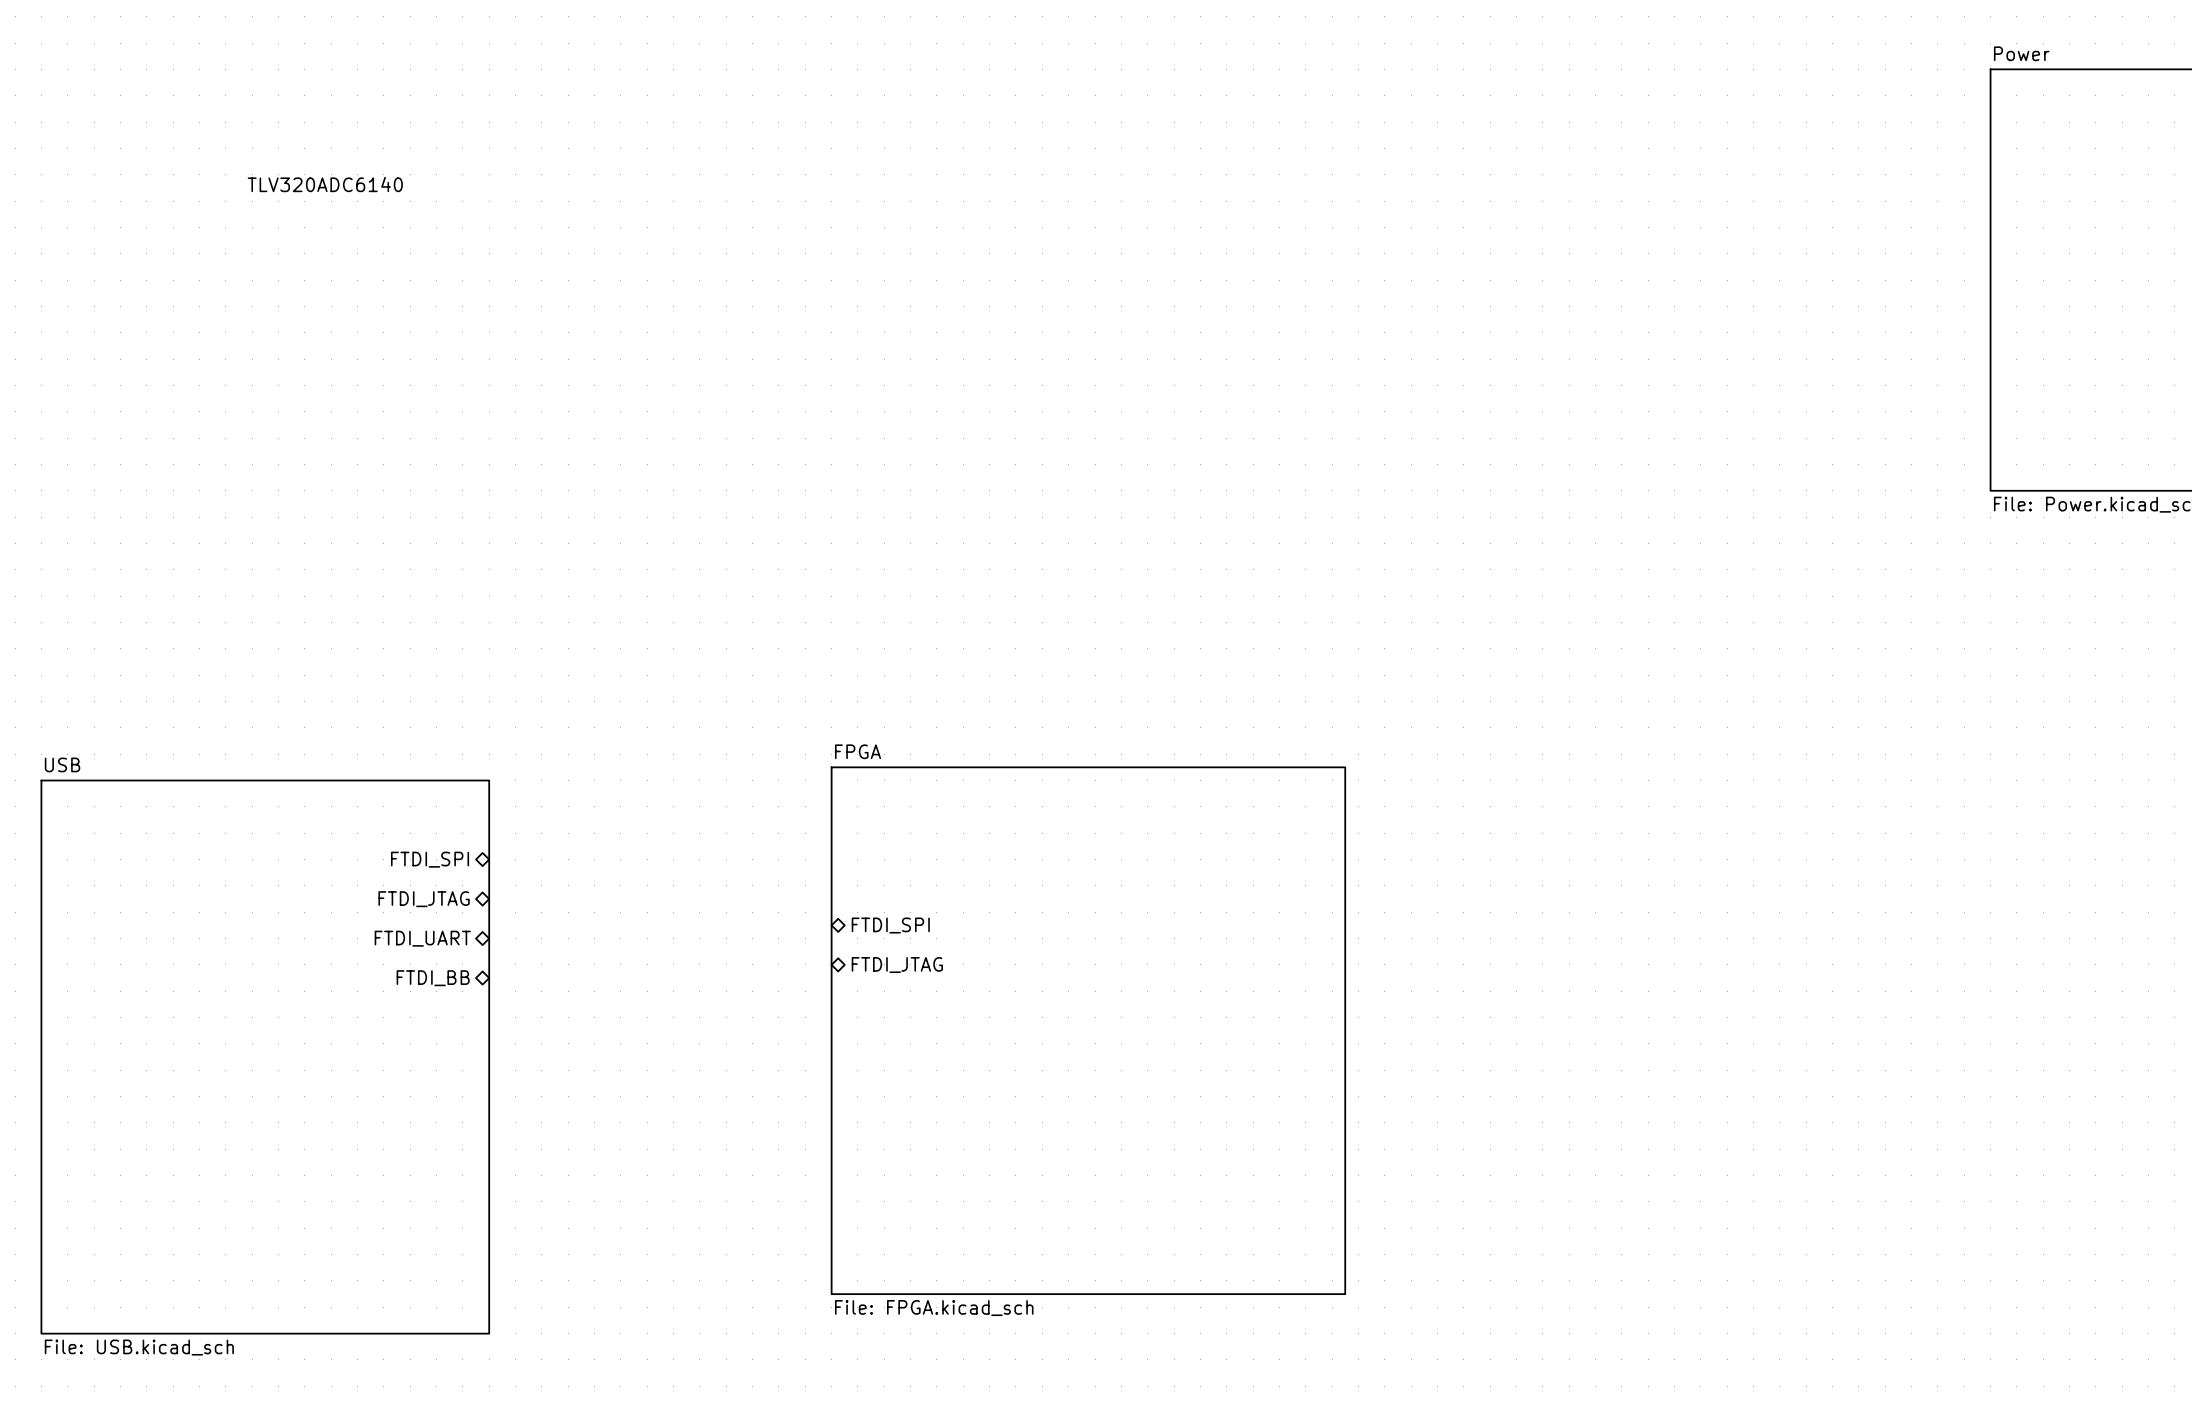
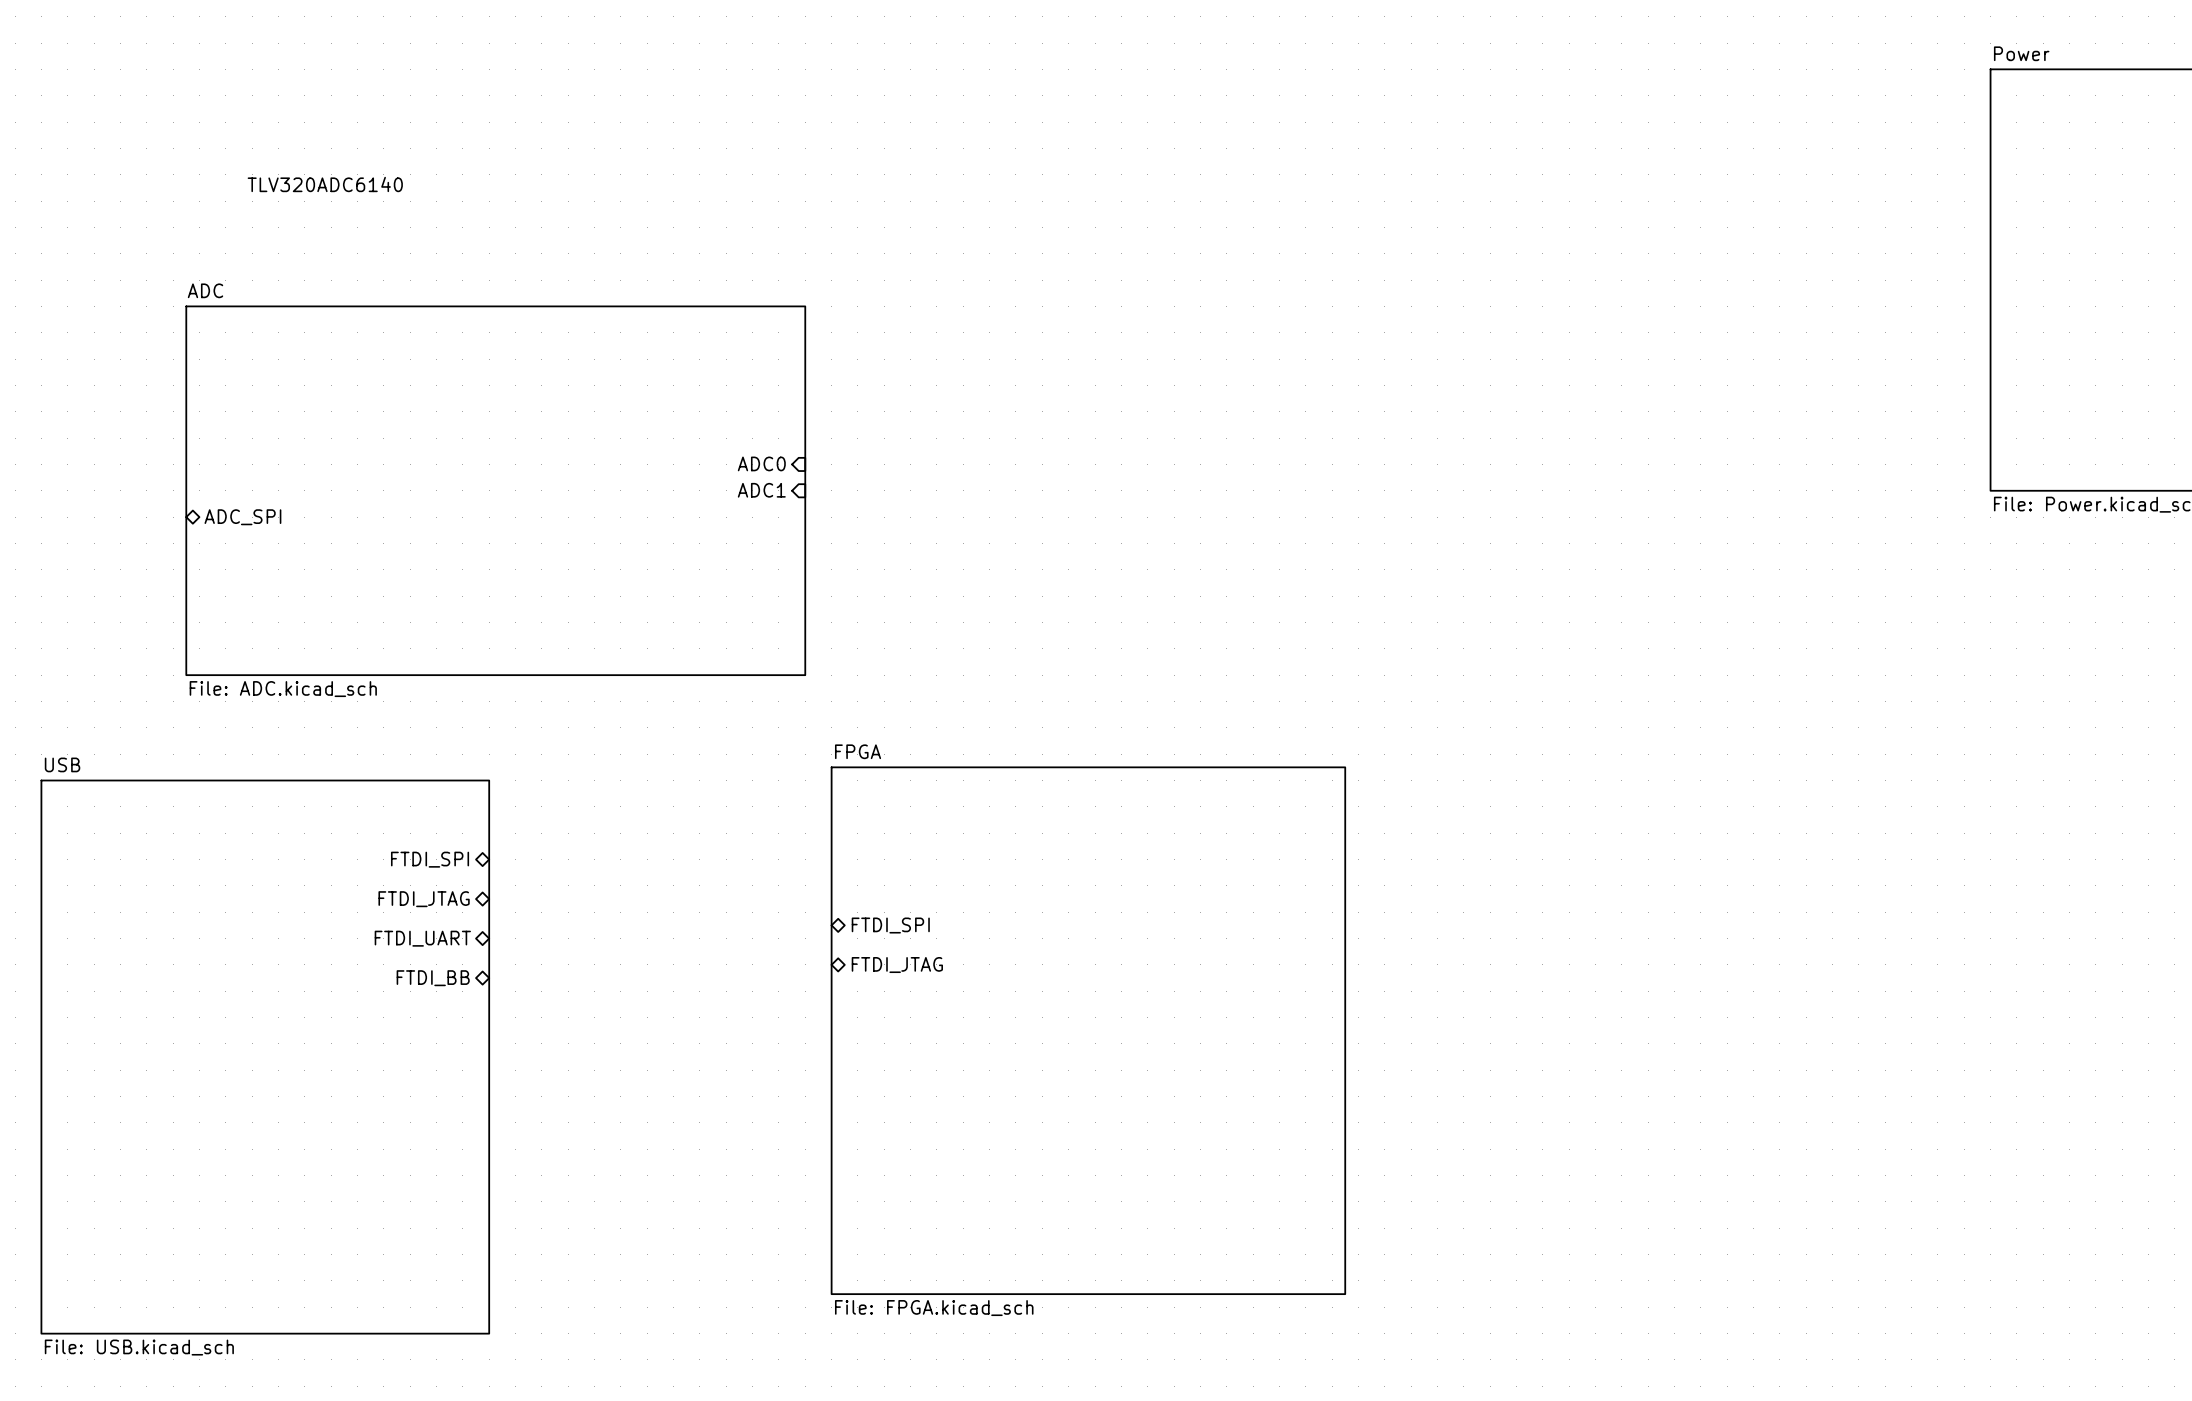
sheet pin: none -> ADC0 (761, 463)
sheet ADC: none -> File: ADC.kicad_sch (495, 490)
sheet pin: none -> ADC1 (761, 490)
sheet pin: none -> ADC_SPI (242, 517)

